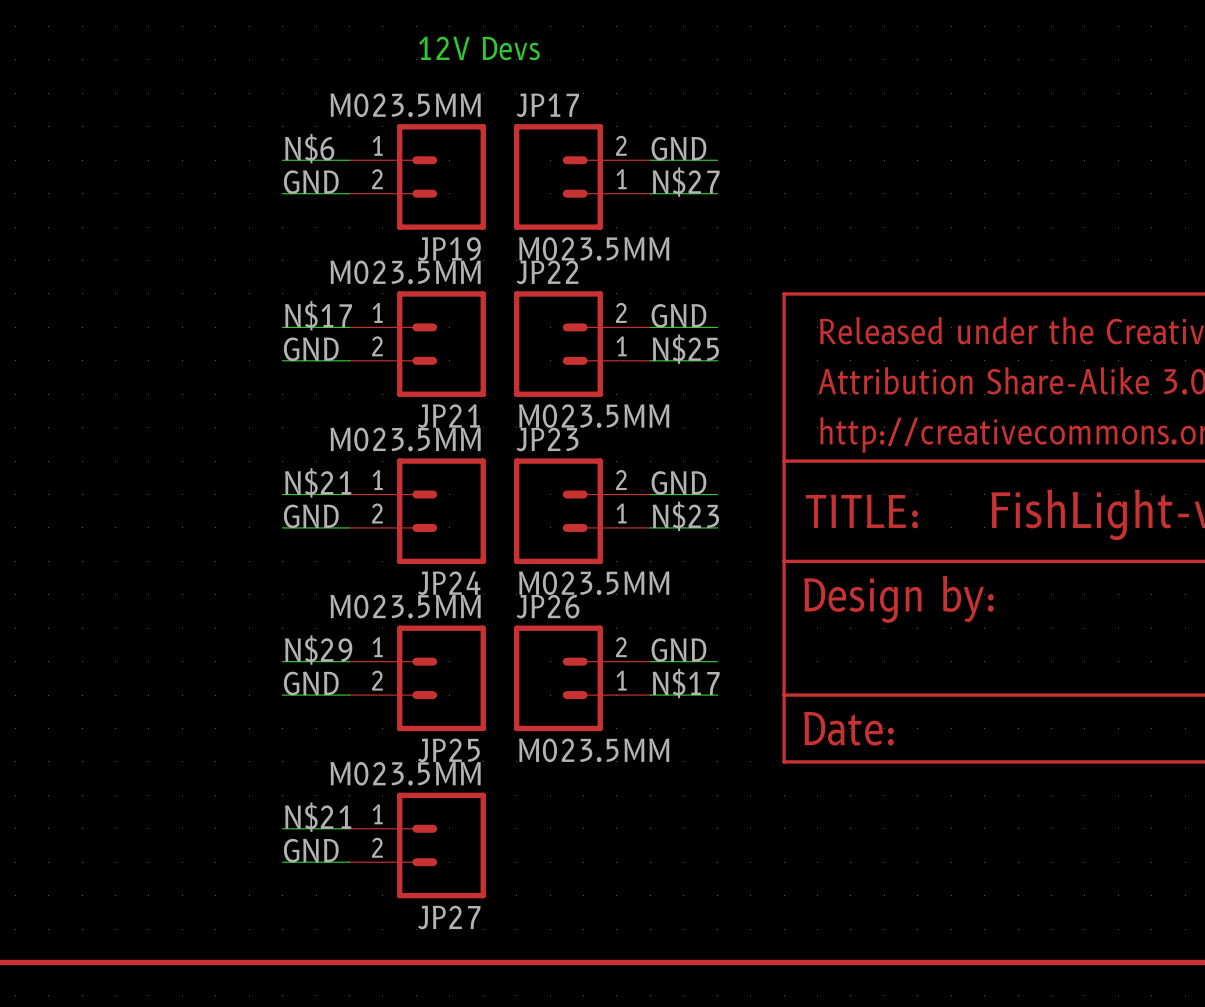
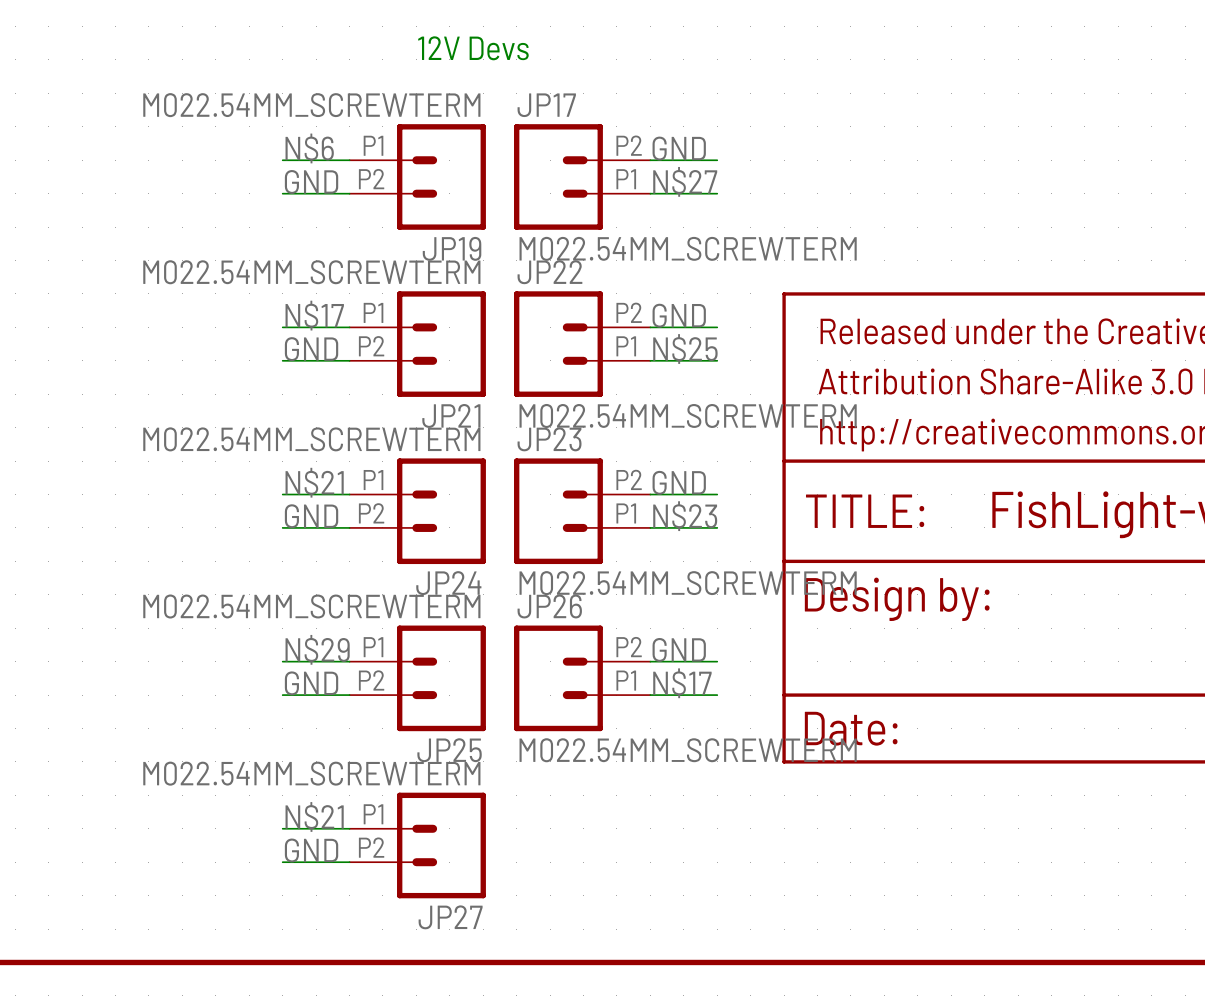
JP19 value: M023.5MM (405, 105) -> M022.54MM_SCREWTERM (311, 105)
JP19 pin number: 1 (377, 145) -> P1 (373, 145)
JP17 pin number: 2 (621, 145) -> P2 (629, 145)
JP19 pin number: 2 (377, 179) -> P2 (371, 179)
JP17 pin number: 1 (621, 179) -> P1 (626, 179)
JP17 value: M023.5MM (594, 248) -> M022.54MM_SCREWTERM (688, 248)
JP21 value: M023.5MM (405, 272) -> M022.54MM_SCREWTERM (311, 272)
JP21 pin number: 1 (377, 312) -> P1 (373, 312)
JP22 pin number: 2 (621, 312) -> P2 (629, 312)
JP21 pin number: 2 (377, 346) -> P2 (371, 346)
JP22 pin number: 1 (621, 346) -> P1 (626, 346)
JP22 value: M023.5MM (594, 416) -> M022.54MM_SCREWTERM (688, 415)
JP24 value: M023.5MM (405, 439) -> M022.54MM_SCREWTERM (311, 439)
JP24 pin number: 1 (377, 480) -> P1 (373, 480)
JP23 pin number: 2 (621, 480) -> P2 (629, 479)
JP24 pin number: 2 (377, 513) -> P2 (371, 513)
JP23 pin number: 1 (621, 513) -> P1 (626, 513)
JP23 value: M023.5MM (594, 583) -> M022.54MM_SCREWTERM (688, 583)
JP25 value: M023.5MM (405, 606) -> M022.54MM_SCREWTERM (311, 606)
JP25 pin number: 1 (377, 647) -> P1 (373, 647)
JP26 pin number: 2 (621, 647) -> P2 (629, 647)
JP25 pin number: 2 (377, 680) -> P2 (371, 680)
JP26 pin number: 1 (621, 680) -> P1 (626, 680)
JP26 value: M023.5MM (594, 750) -> M022.54MM_SCREWTERM (688, 750)
JP27 value: M023.5MM (405, 773) -> M022.54MM_SCREWTERM (311, 773)
JP27 pin number: 1 (377, 814) -> P1 (373, 814)
JP27 pin number: 2 (377, 847) -> P2 (371, 847)

